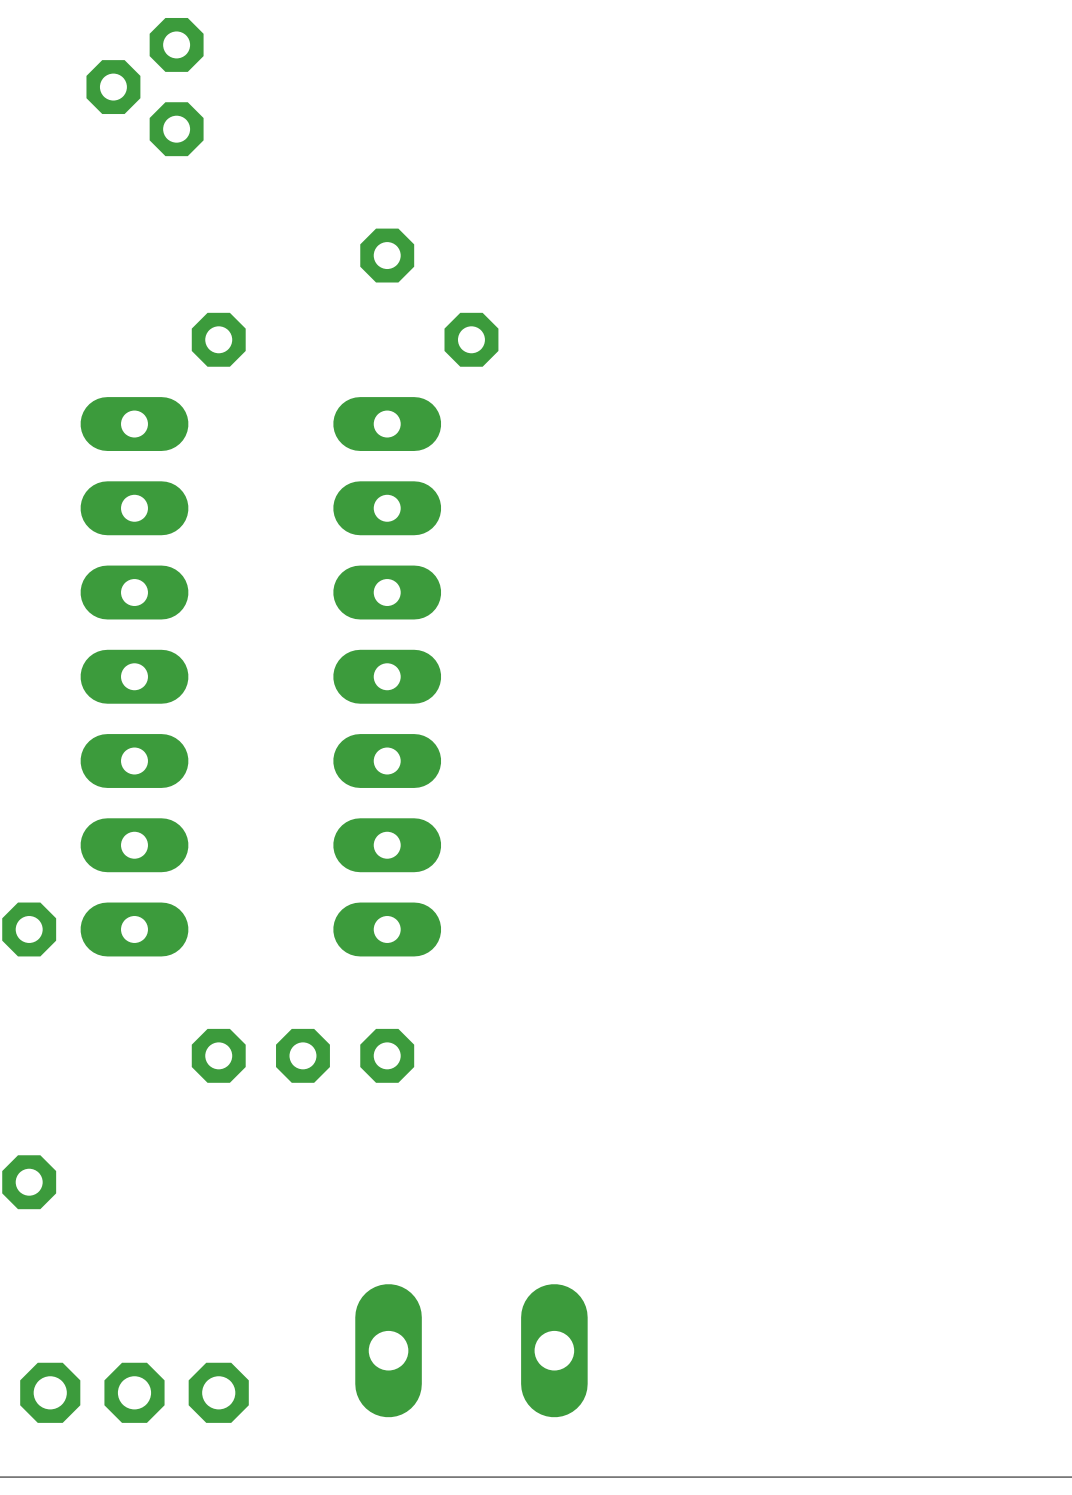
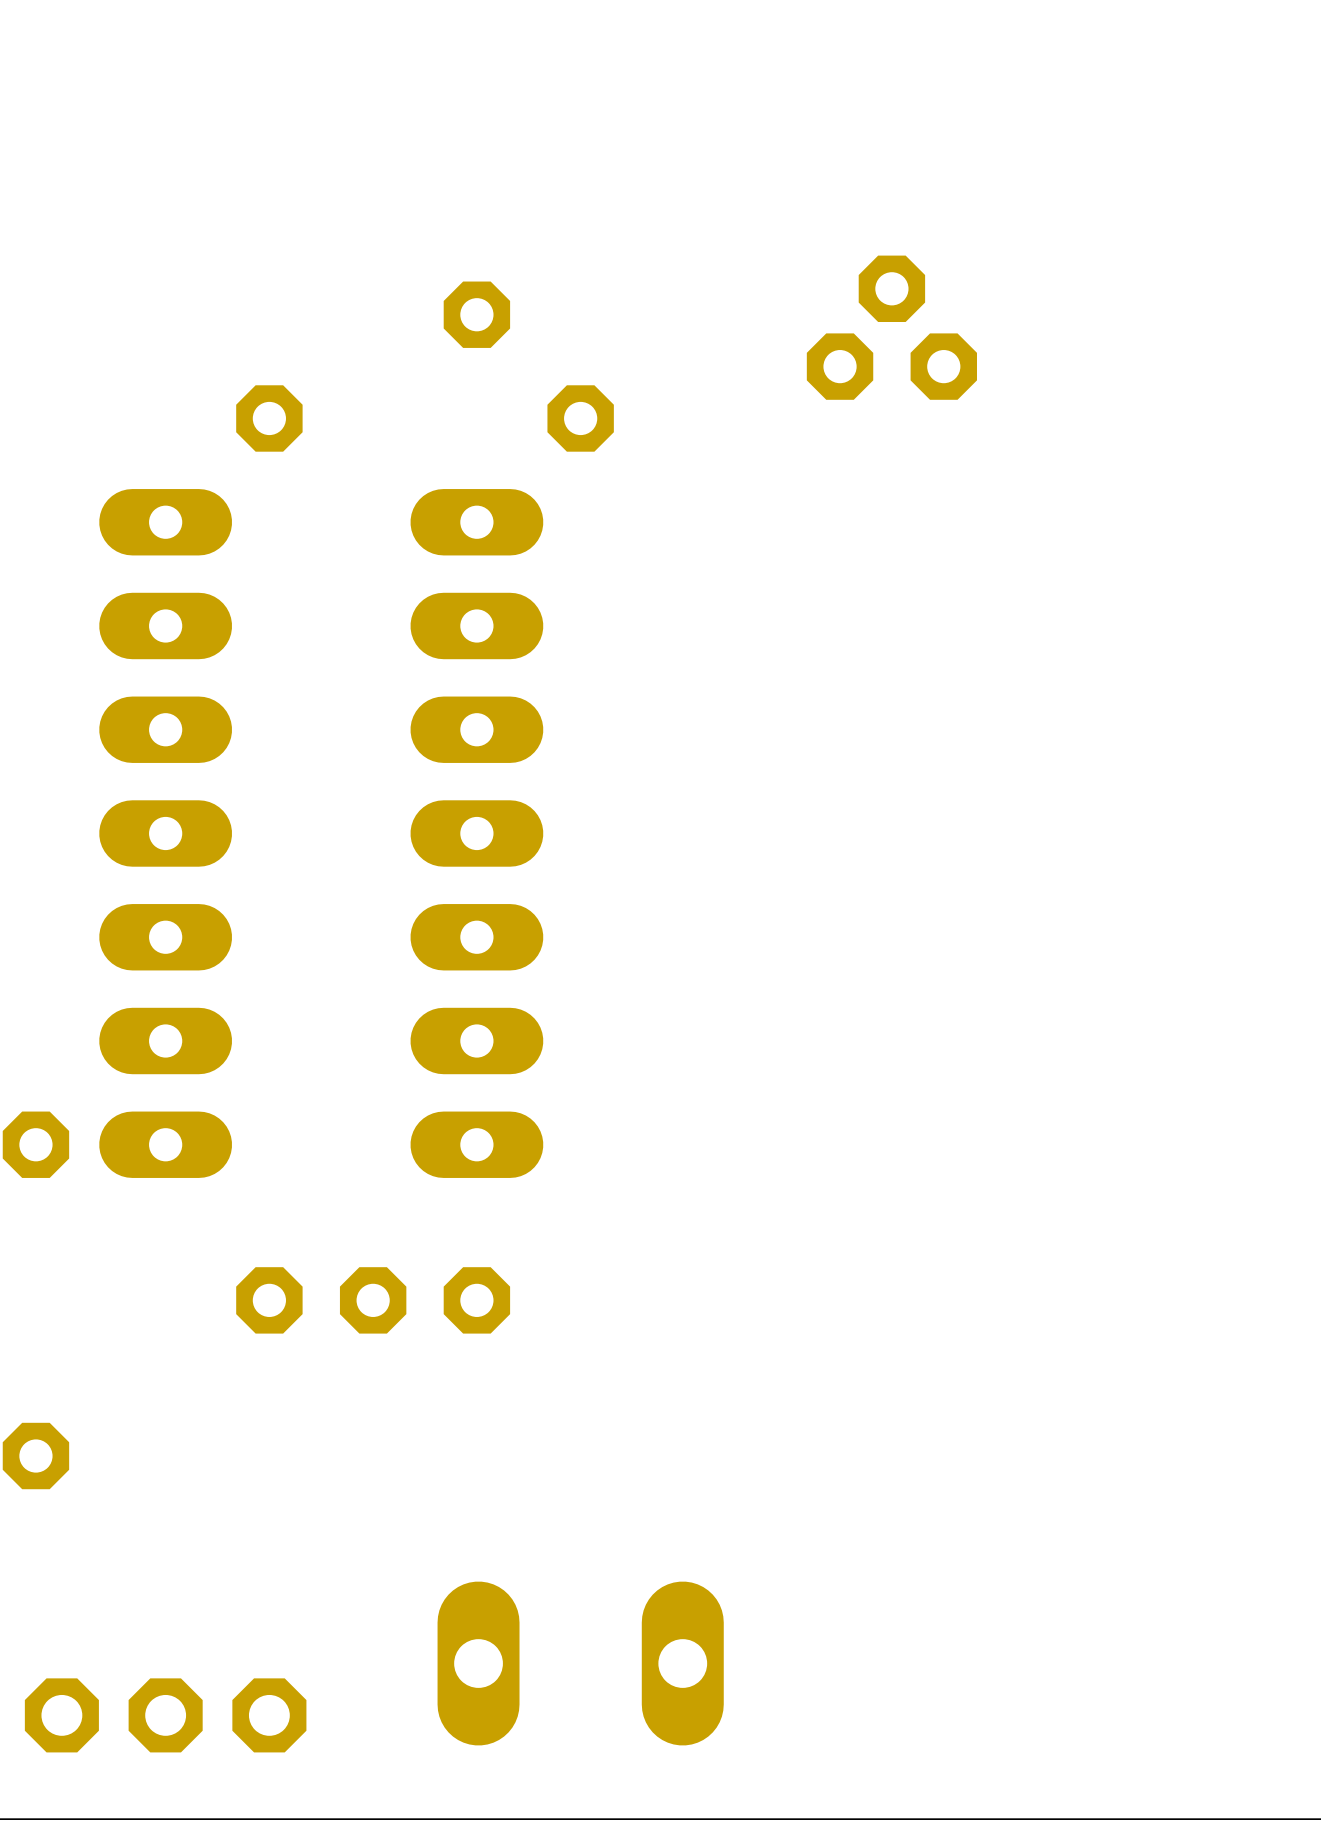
part rotation: 0° (145, 87) -> 90° clockwise (891, 327)
part position: (145, 87) -> (891, 327)

